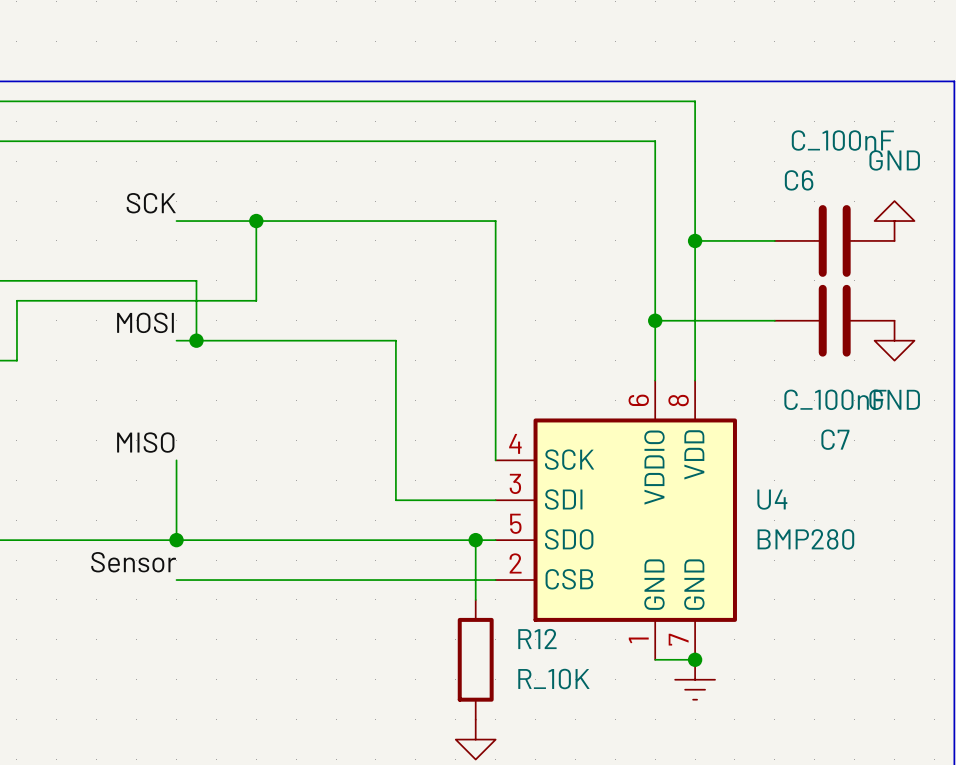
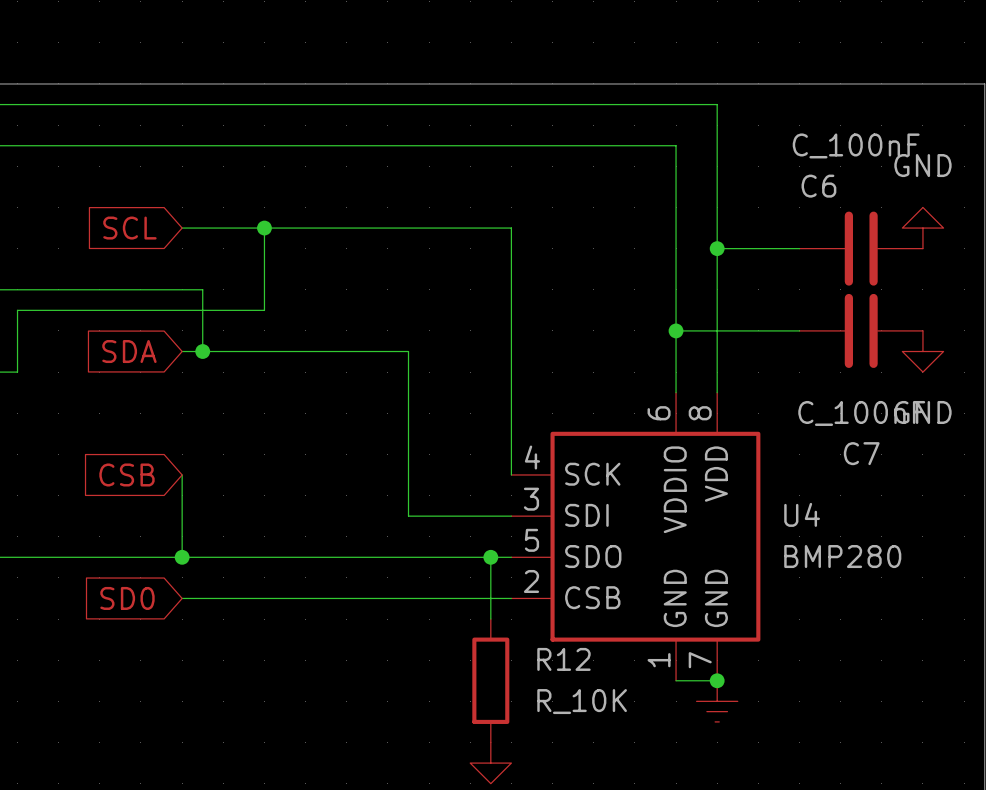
label: SCK (151, 203) -> none
global label: none -> SCL (129, 228)
label: MOSI (145, 322) -> none
global label: none -> SDA (129, 351)
label: MISO (145, 442) -> none
global label: none -> CSB (126, 474)
label: Sensor (133, 562) -> none
global label: none -> SD0 (127, 598)

